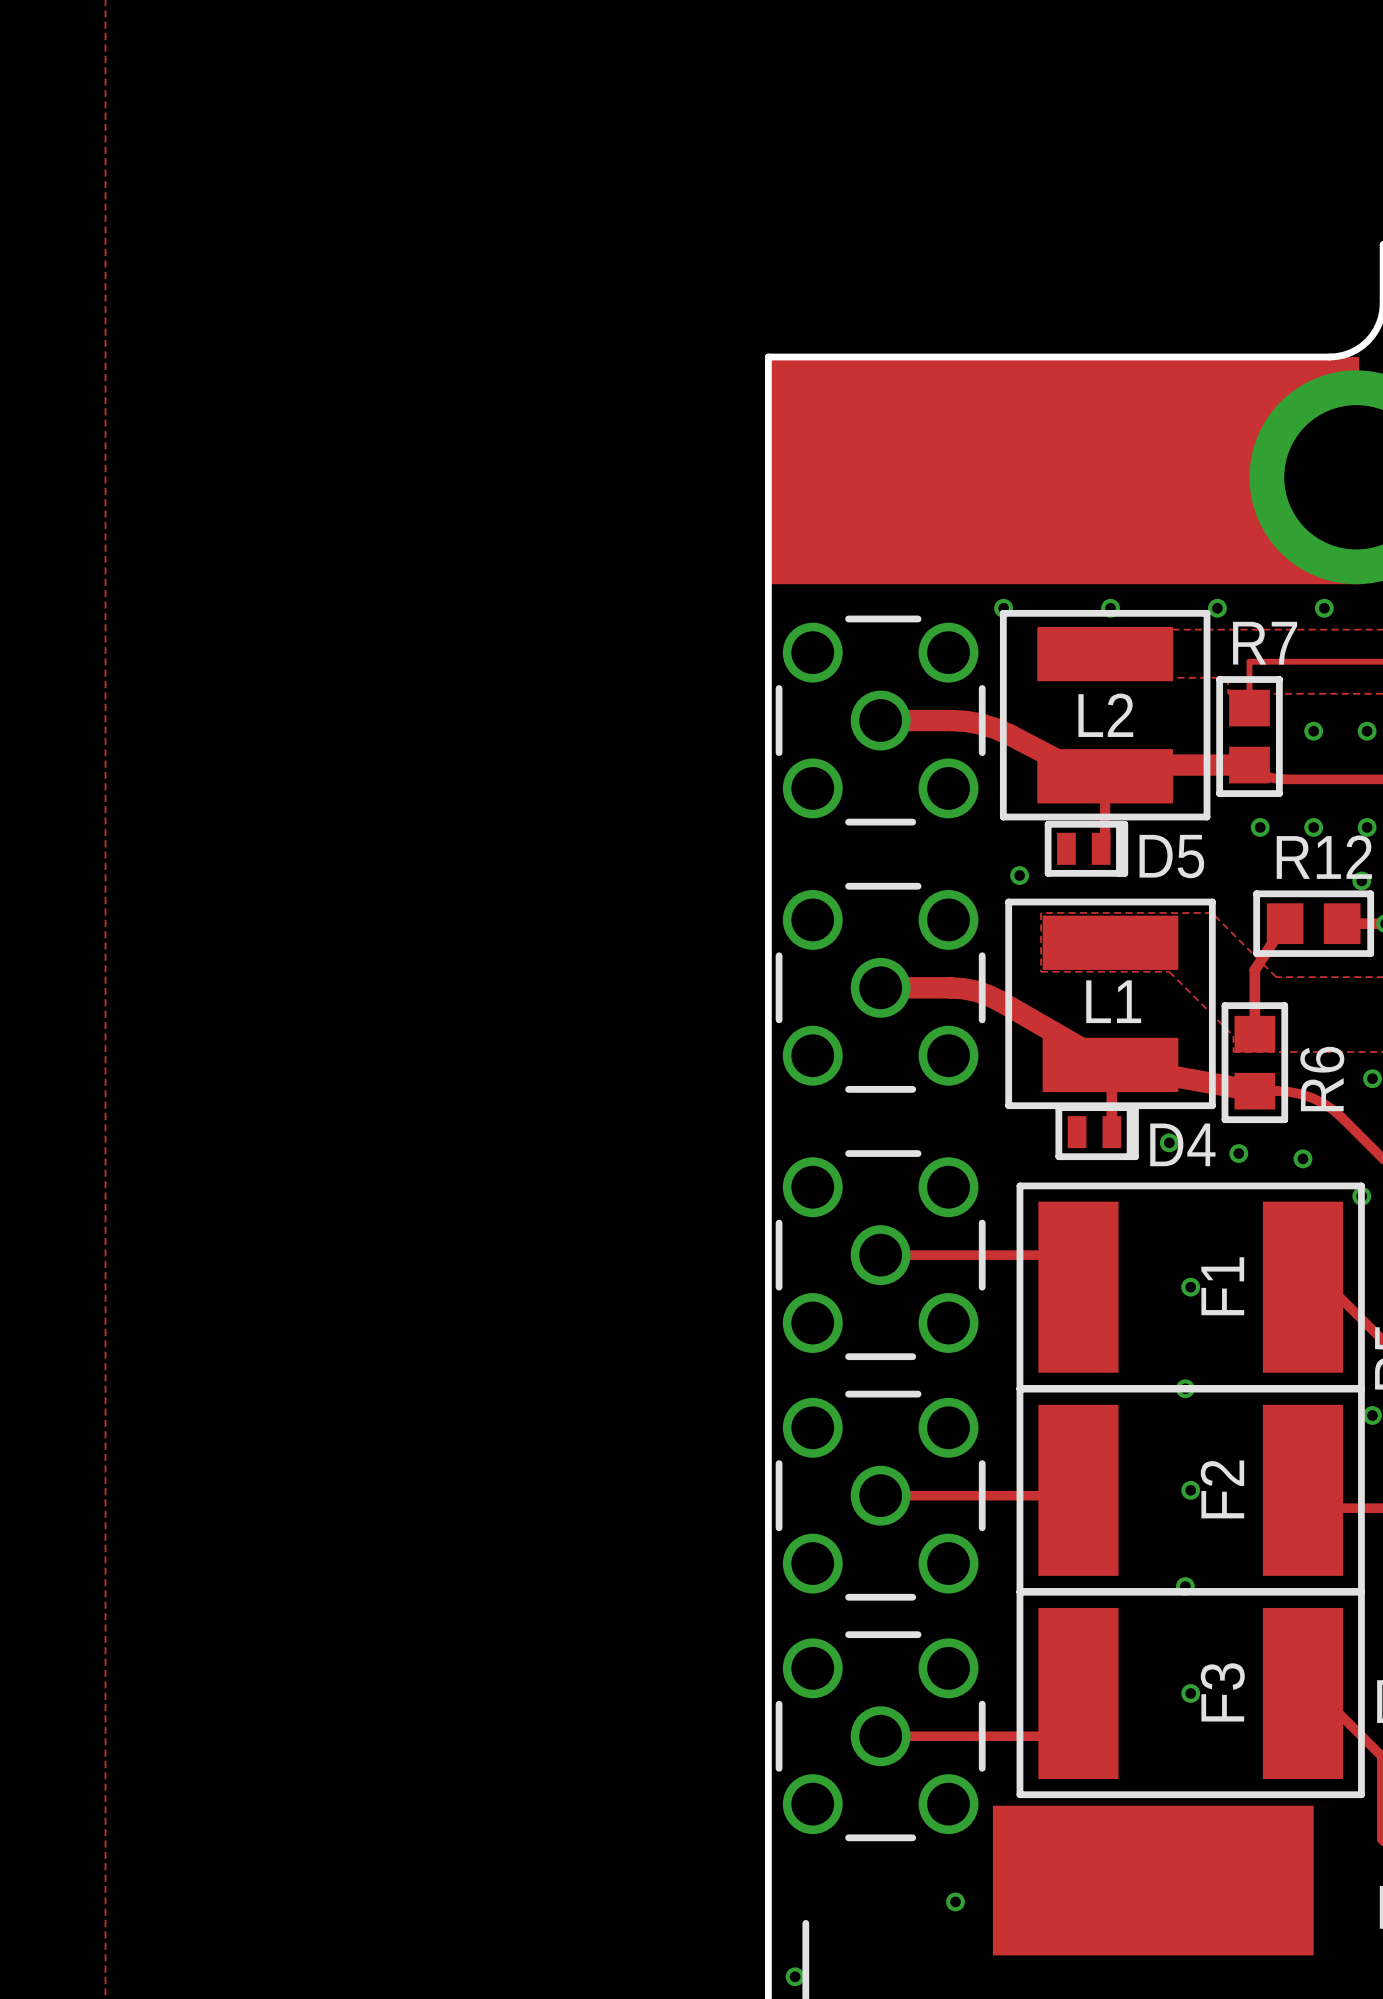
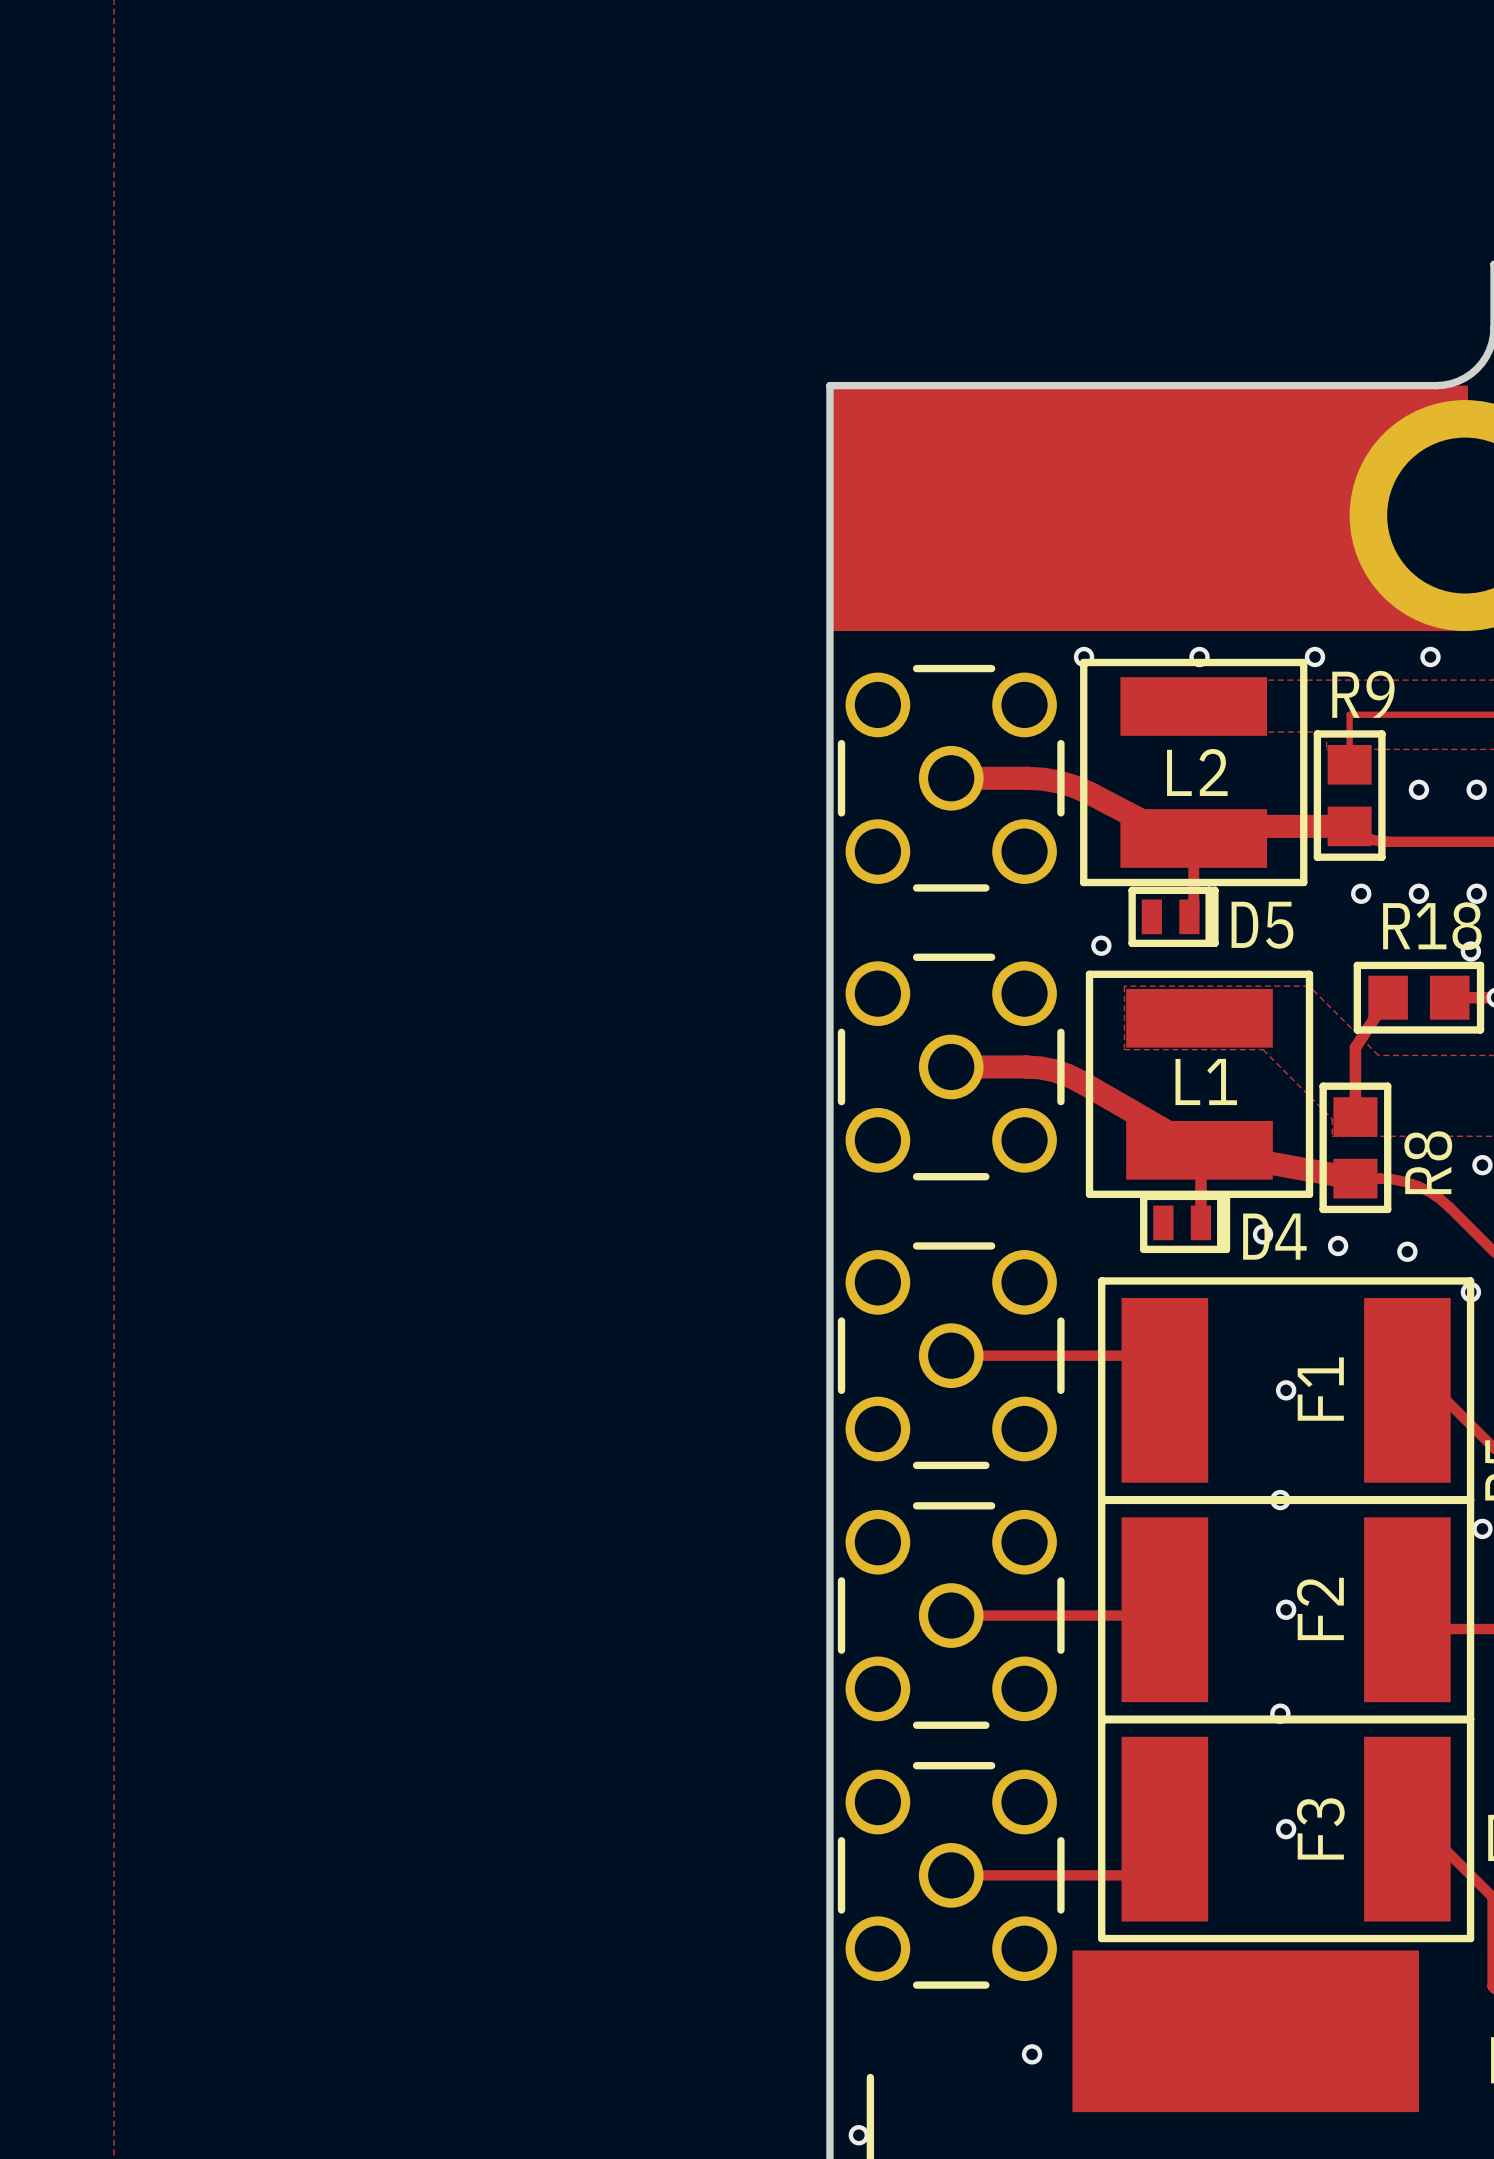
R7 name: R7 (1265, 643) -> R9 (1363, 694)
R12 name: R12 (1324, 857) -> R18 (1432, 926)
R6 name: R6 (1322, 1079) -> R8 (1428, 1162)

